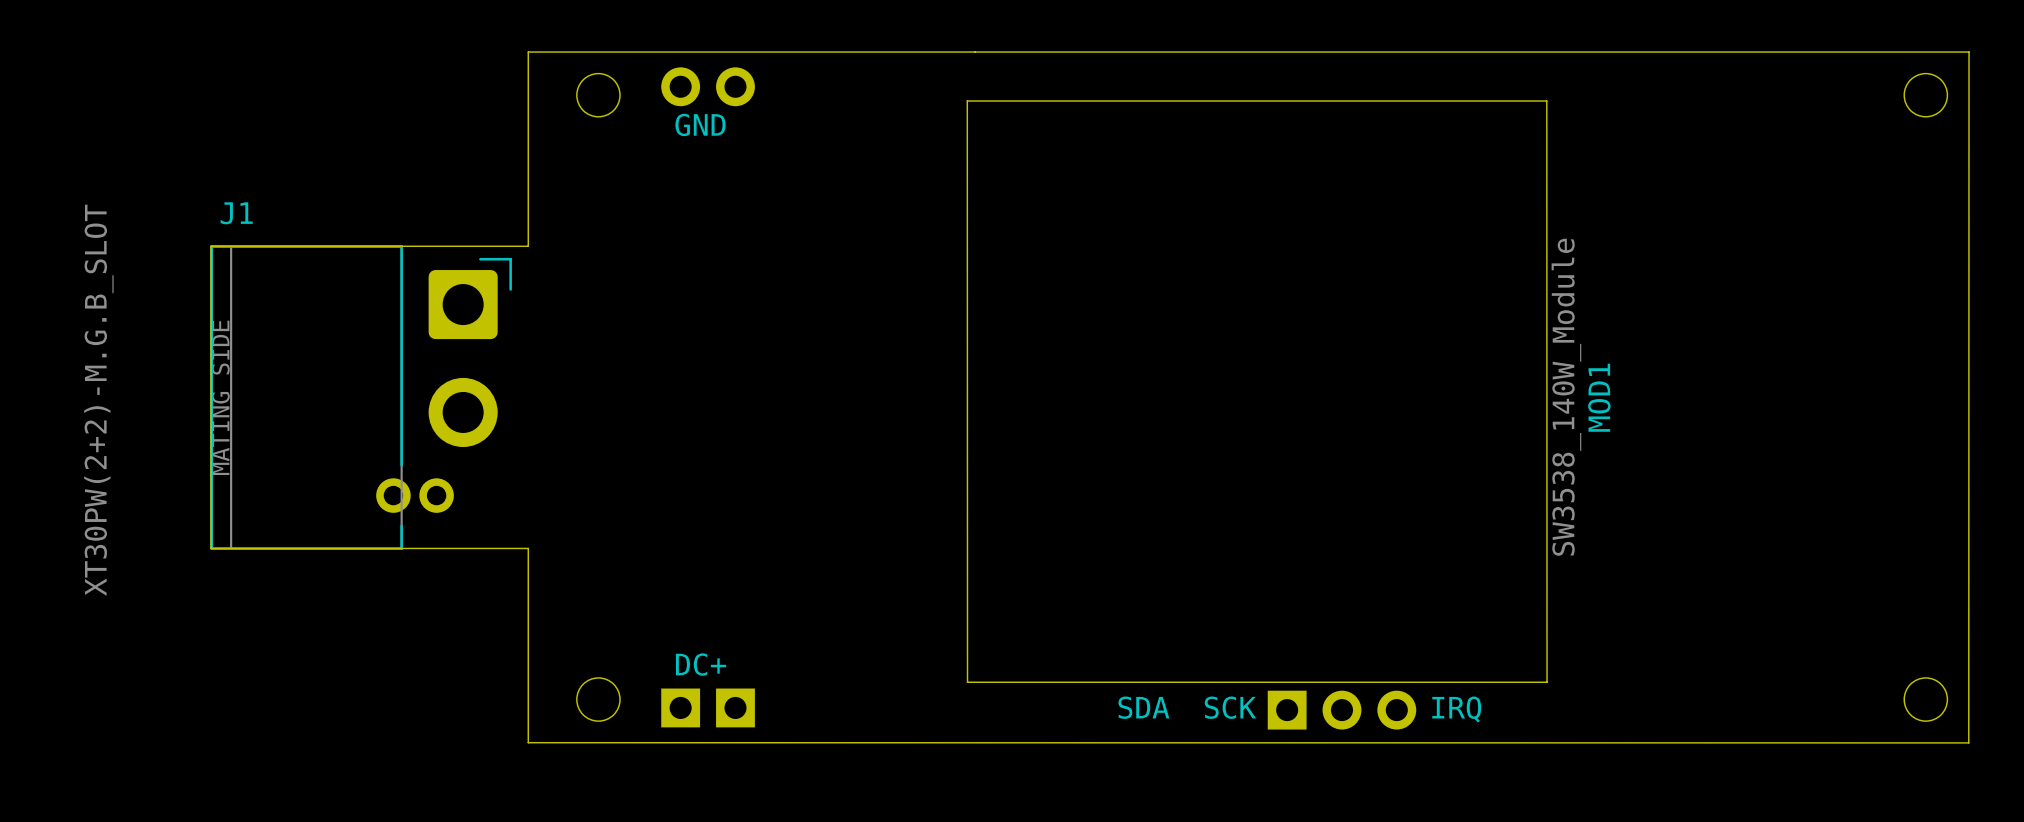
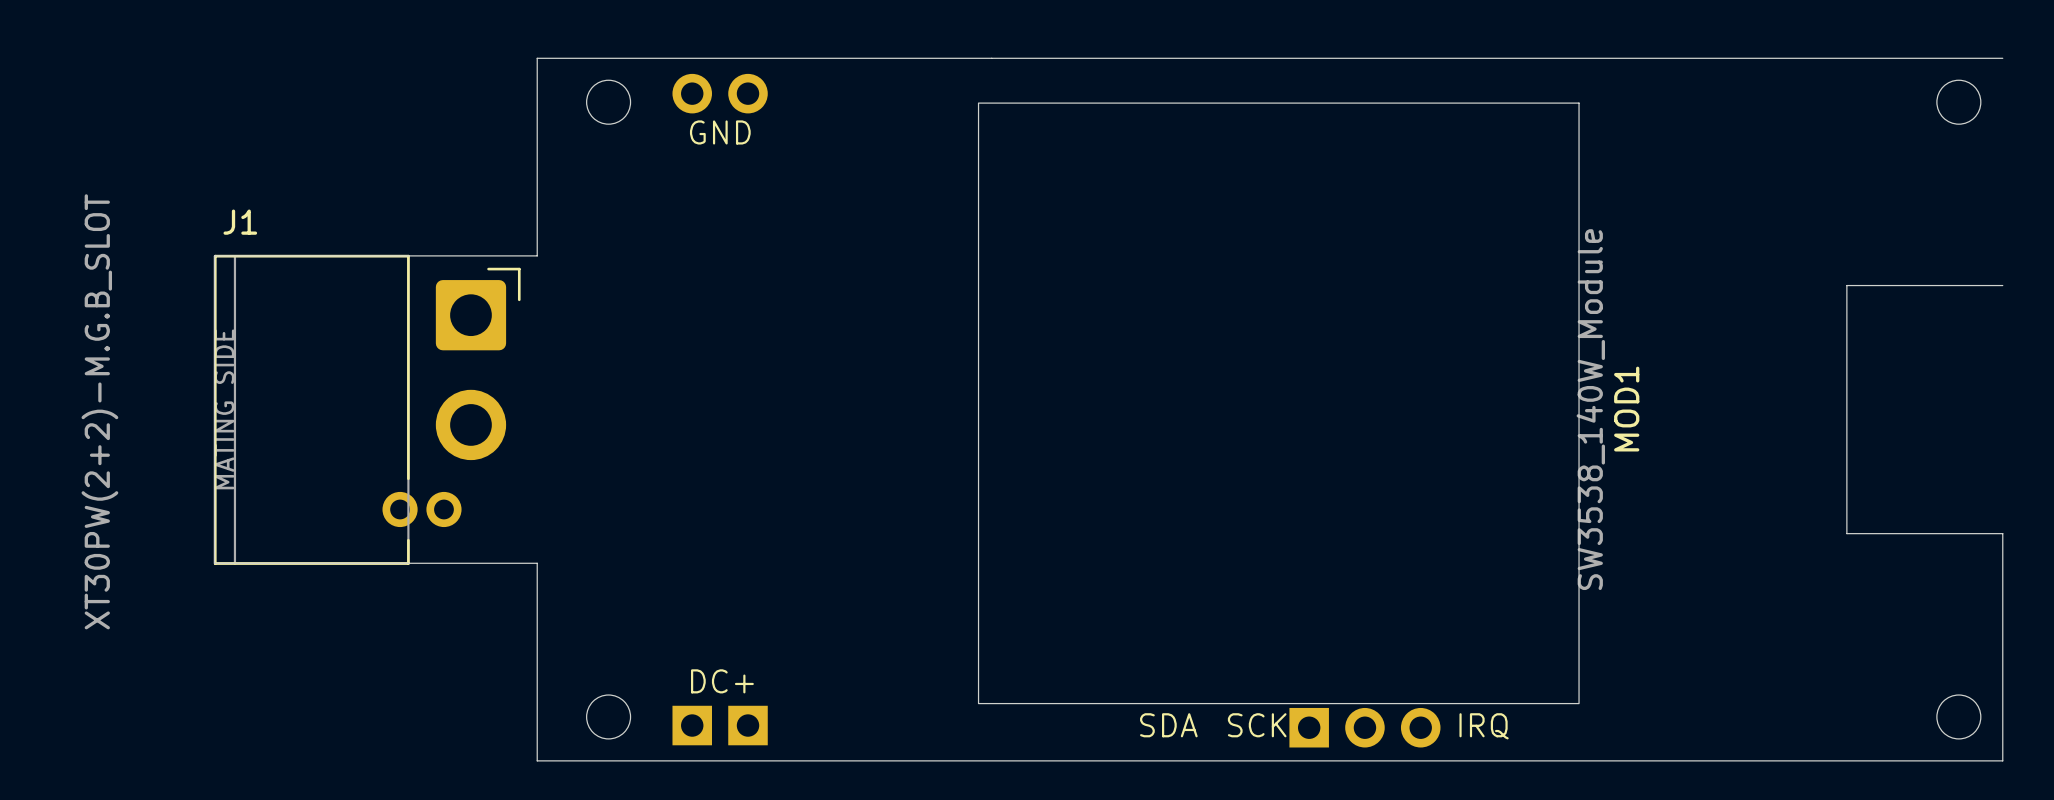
board edge: (1969, 52) (1968, 742) (528, 742) -> (2002, 533) (2002, 760) (537, 760)
MOD1 footprint: [576, 67, 1948, 730] -> [586, 73, 2004, 748]
board edge: (967, 101) (967, 682) (1547, 682) (1546, 101) (967, 101) -> none

